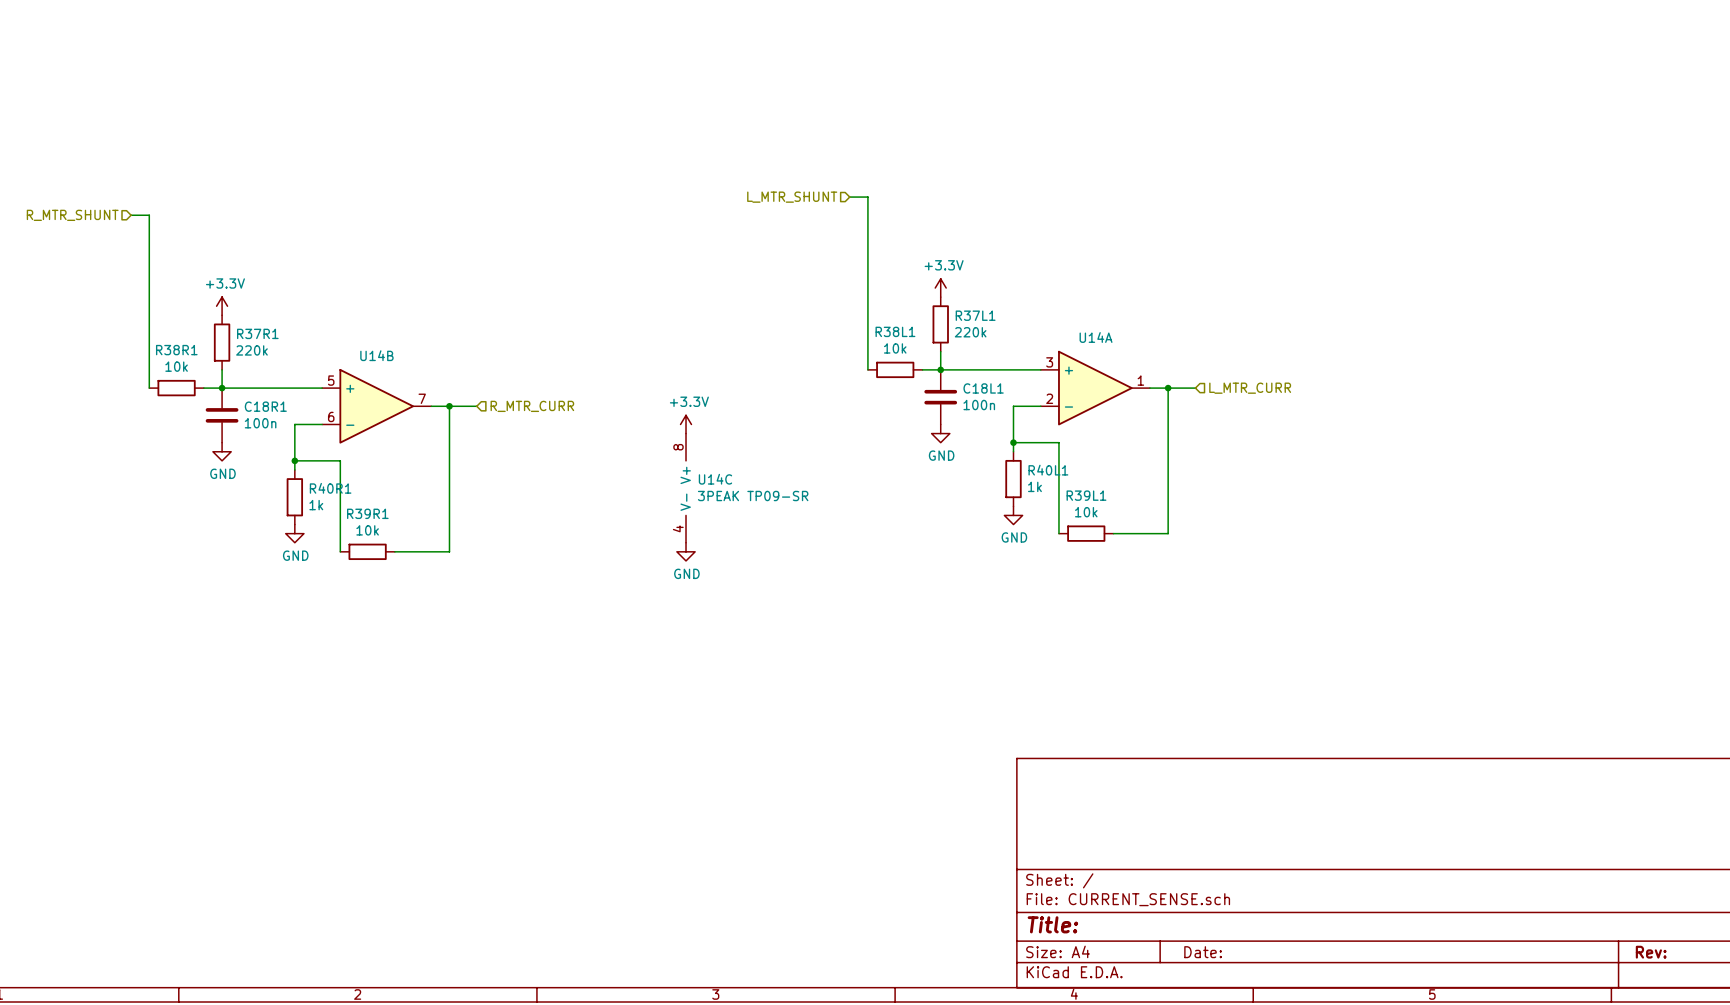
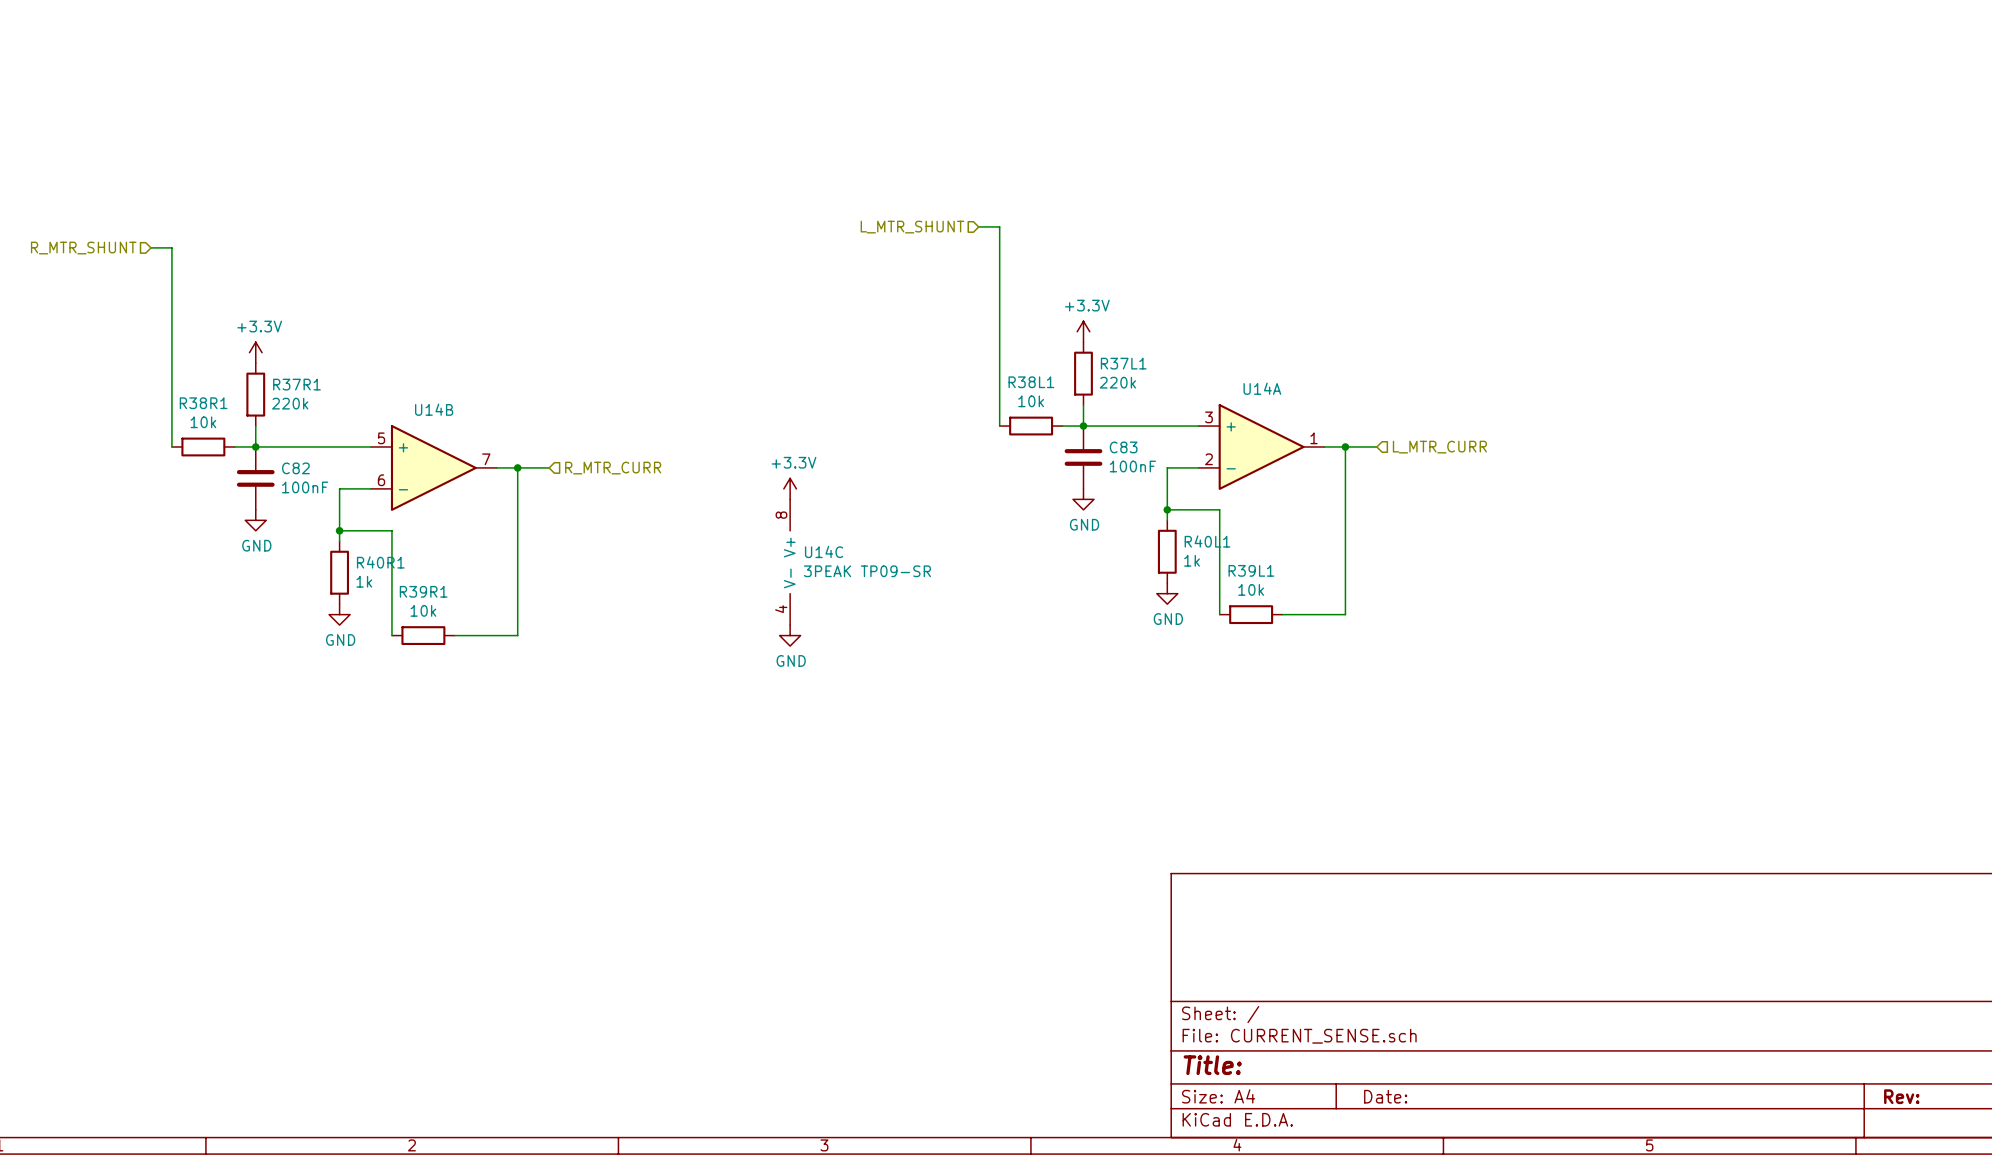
C18L1 name: C18L1 (983, 388) -> C83 (1123, 447)
C18L1 value: 100n (979, 405) -> 100nF (1132, 466)
C18R1 name: C18R1 (265, 406) -> C82 (295, 468)
C18R1 value: 100n (260, 423) -> 100nF (305, 487)

